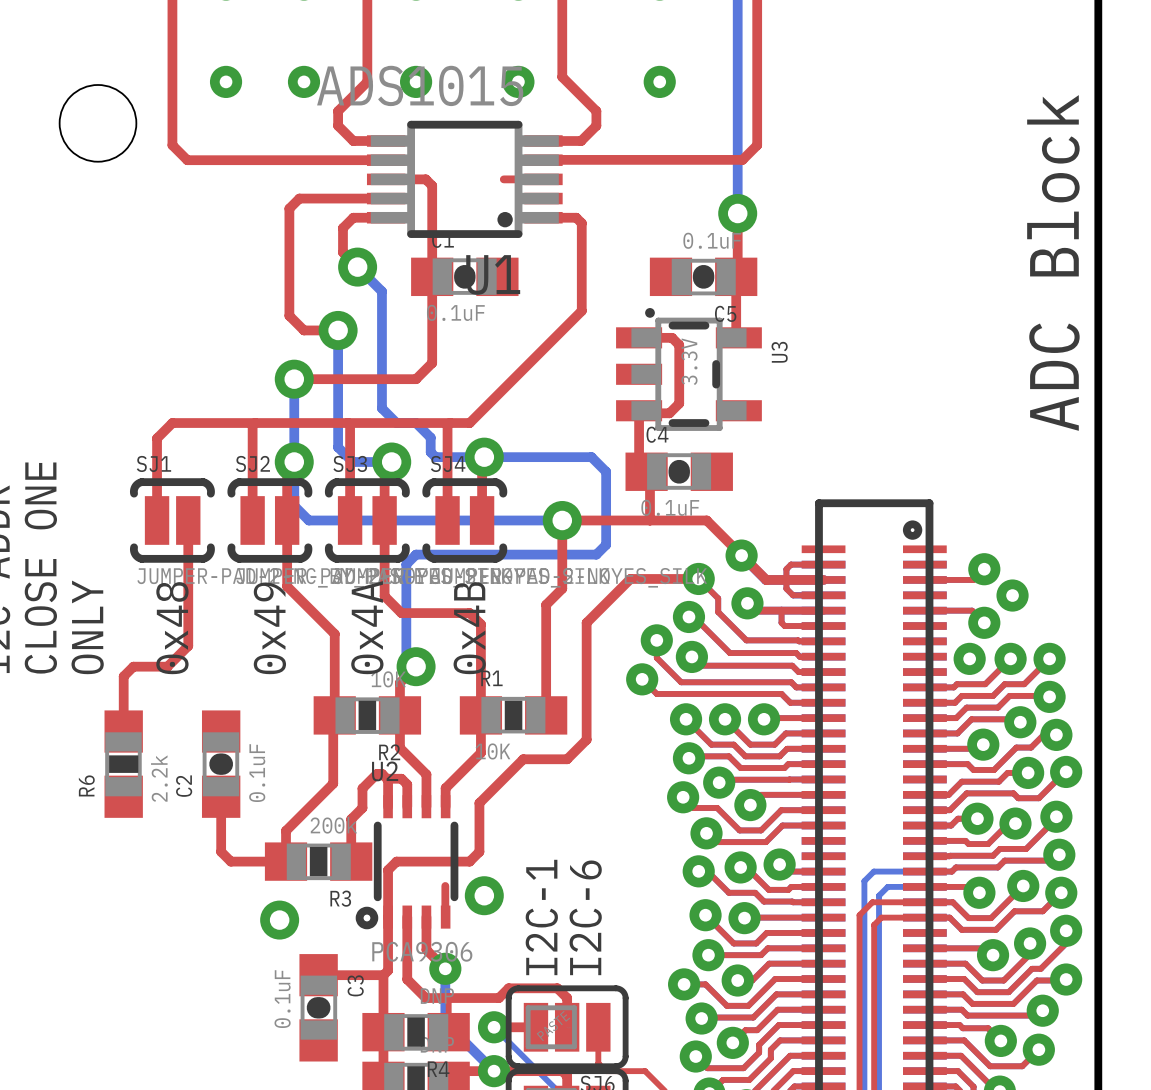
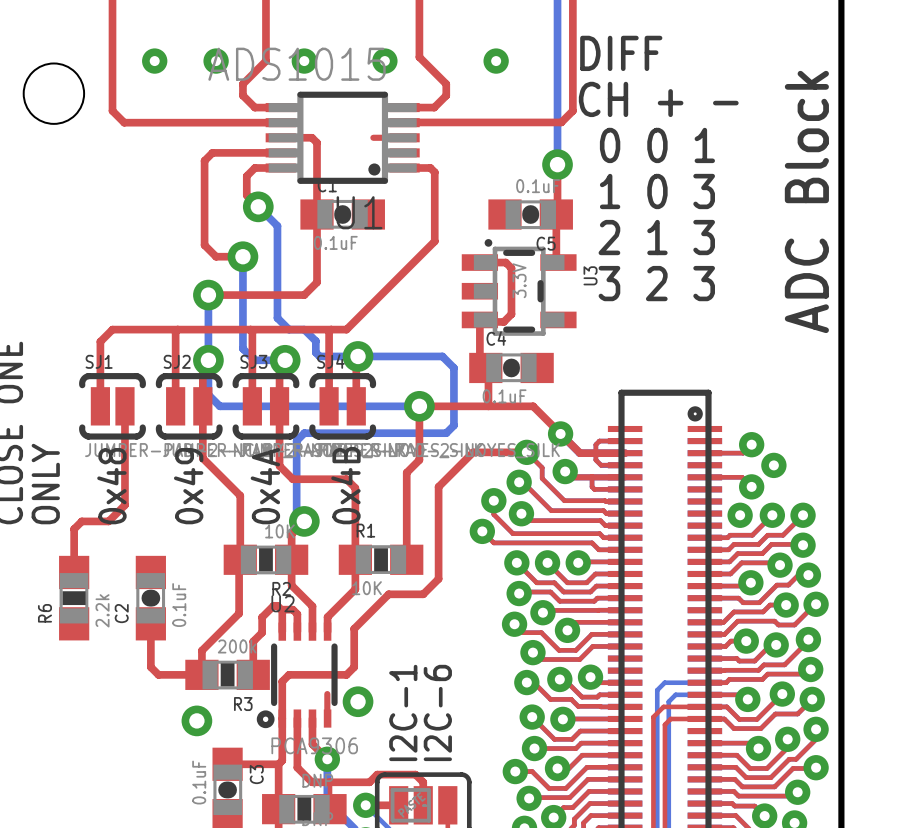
text: none -> DIFF (621, 53)
text: none -> CH + - (658, 99)
text: none -> 0 0 1 (657, 145)
text: none -> 1 0 3 (657, 191)
text: none -> 2 1 3 (656, 237)
text: none -> 3 2 3 (656, 283)

